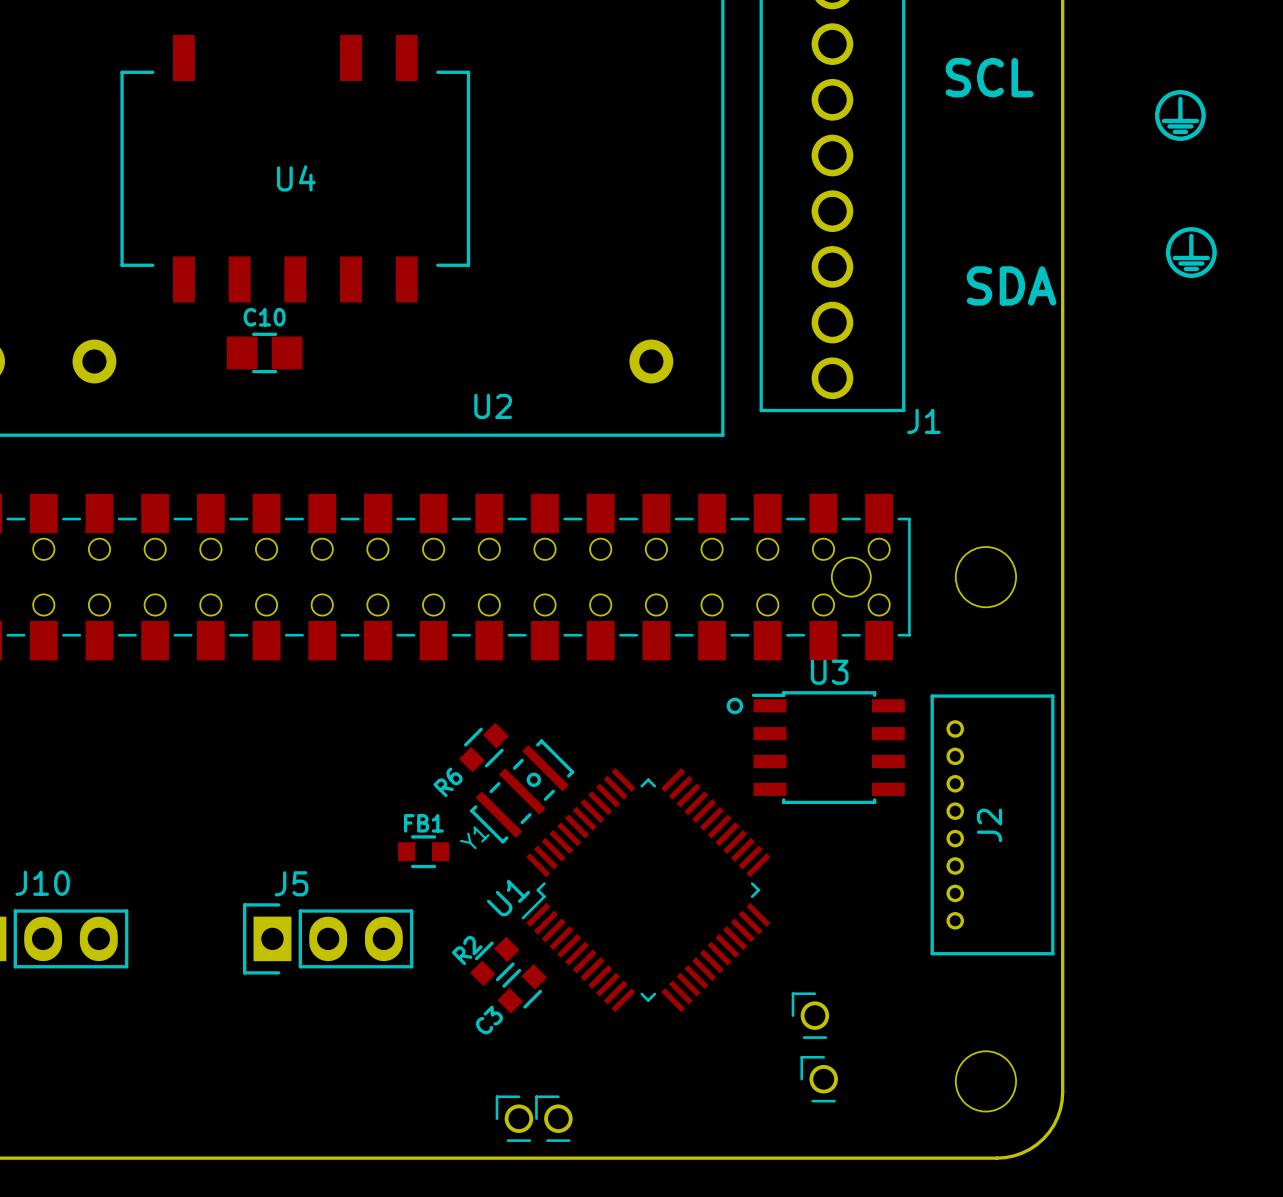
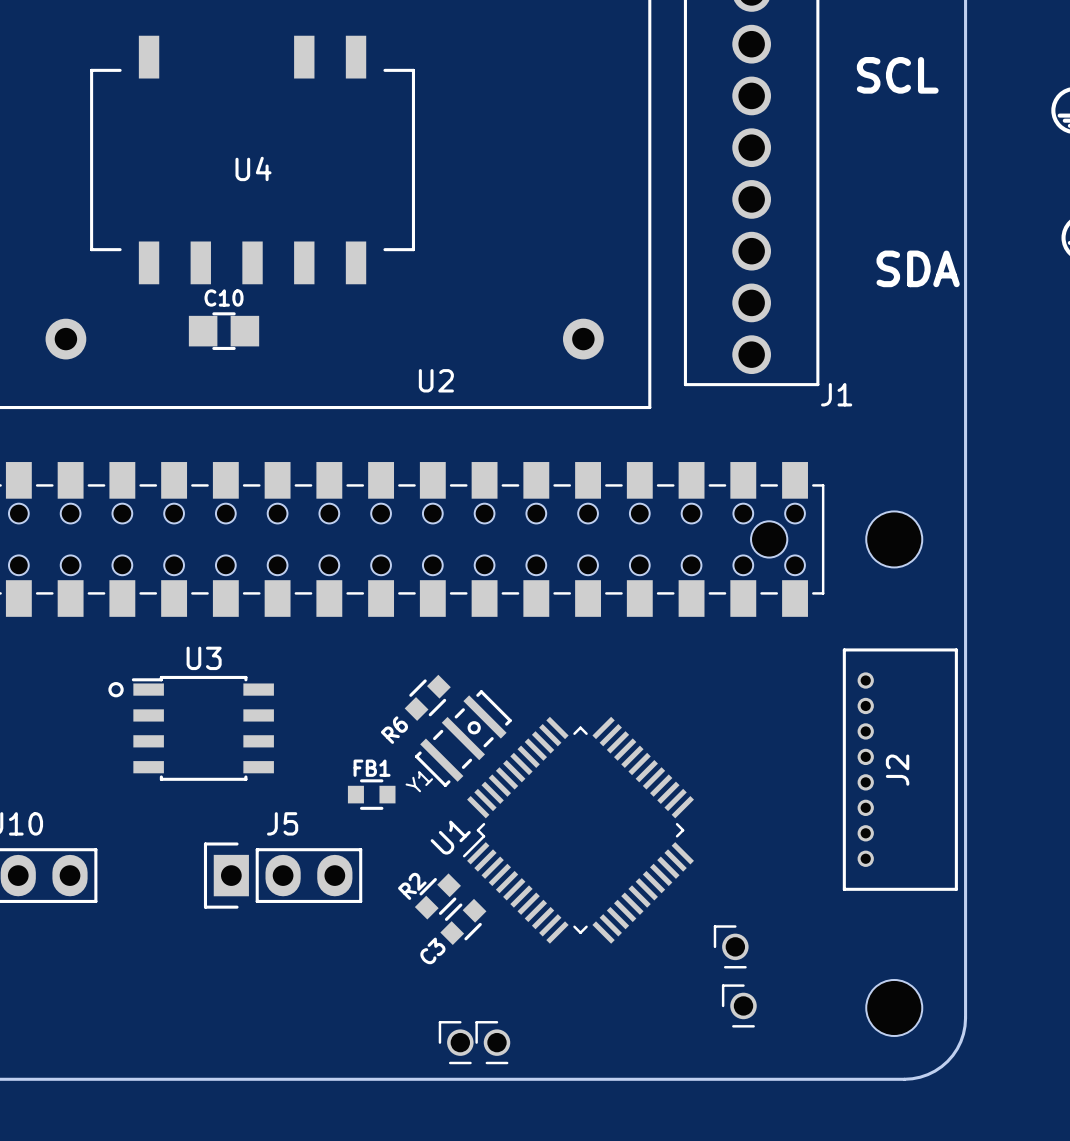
U3 position: (815, 747) -> (191, 728)
J5 name position: J5 (291, 883) -> J5 (282, 823)

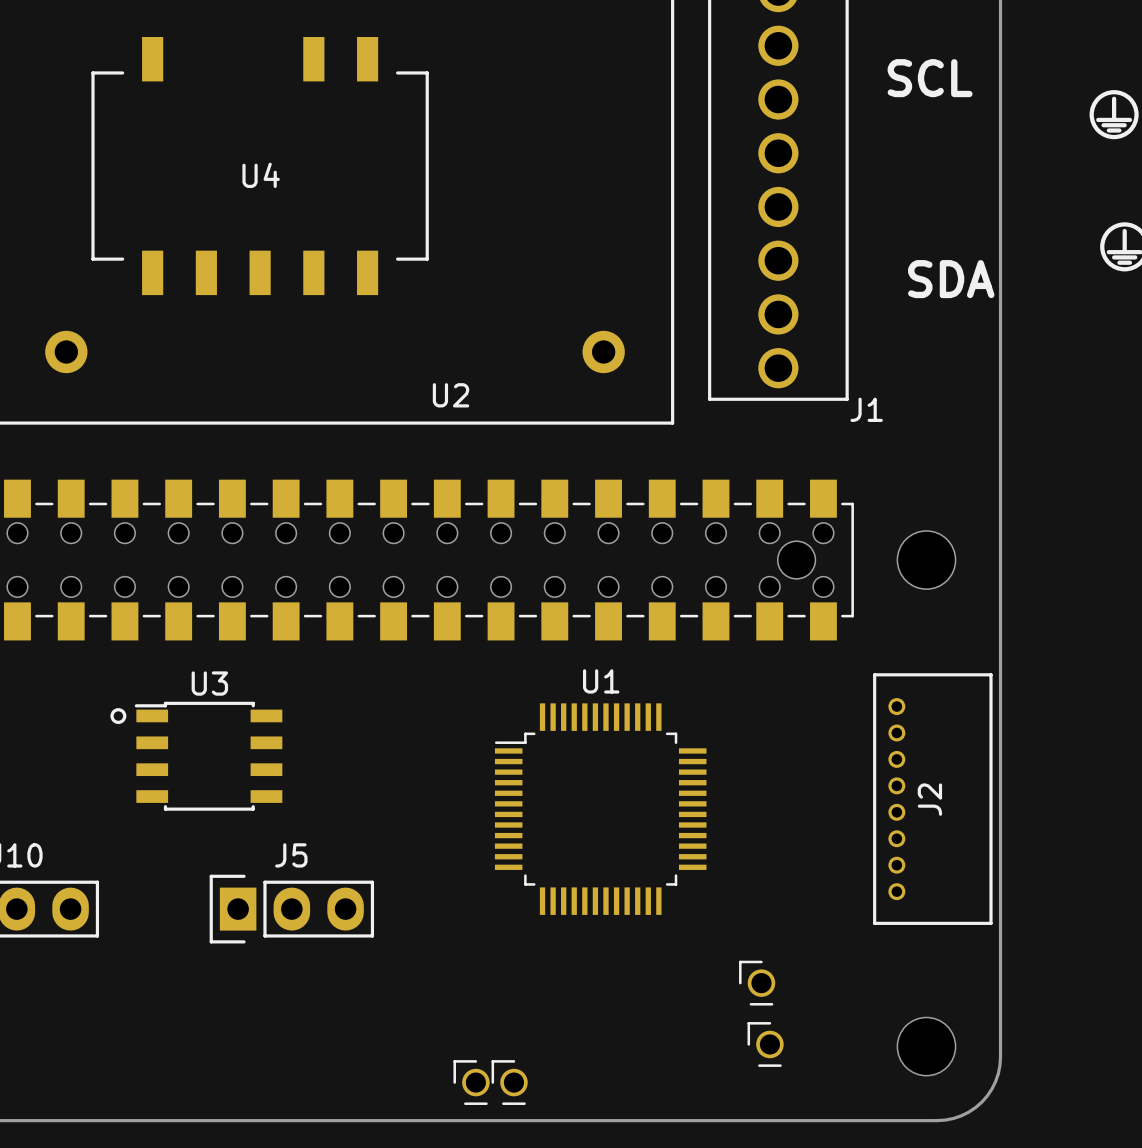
C10: (224, 331) -> none
R6: (427, 697) -> none
Y1: (463, 738) -> none
FB1: (371, 794) -> none
U1 rotation: 0° (578, 830) -> 45° clockwise (600, 809)
U1 name position: U1 (450, 837) -> U1 (601, 681)
R2: (437, 896) -> none
C3: (463, 921) -> none

